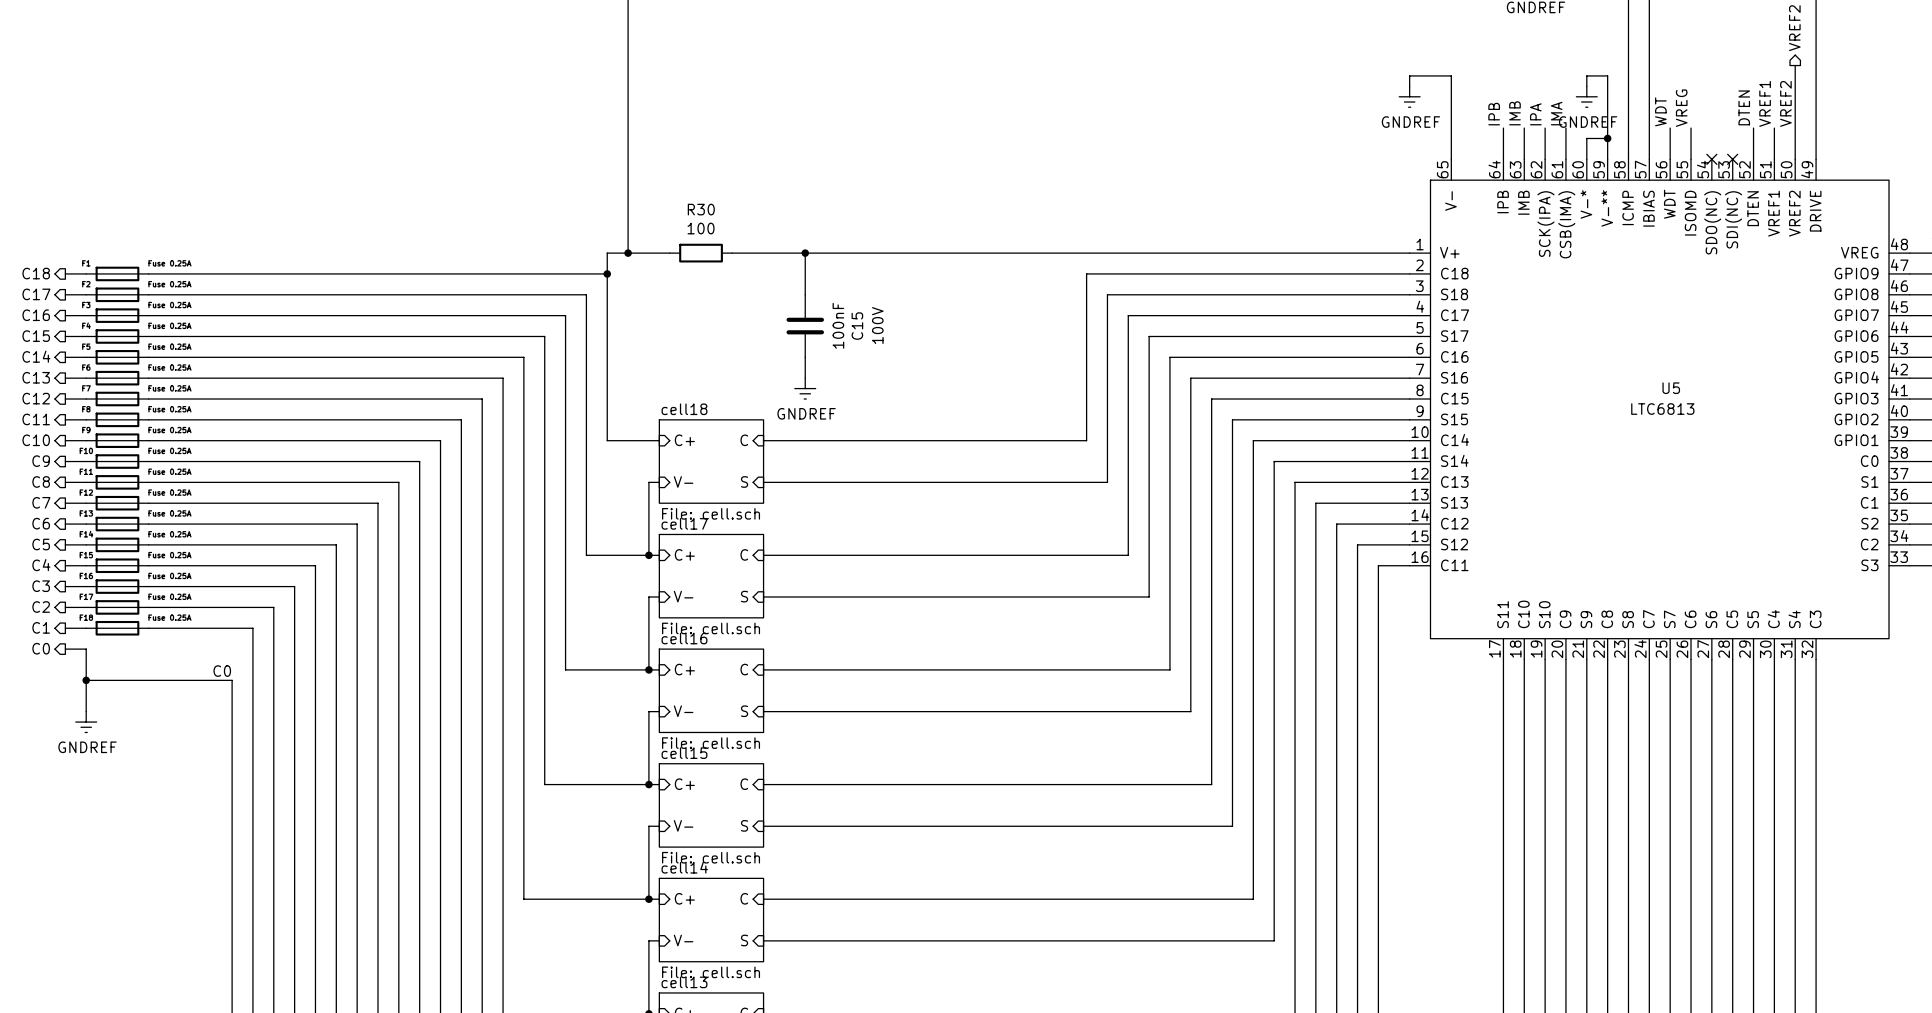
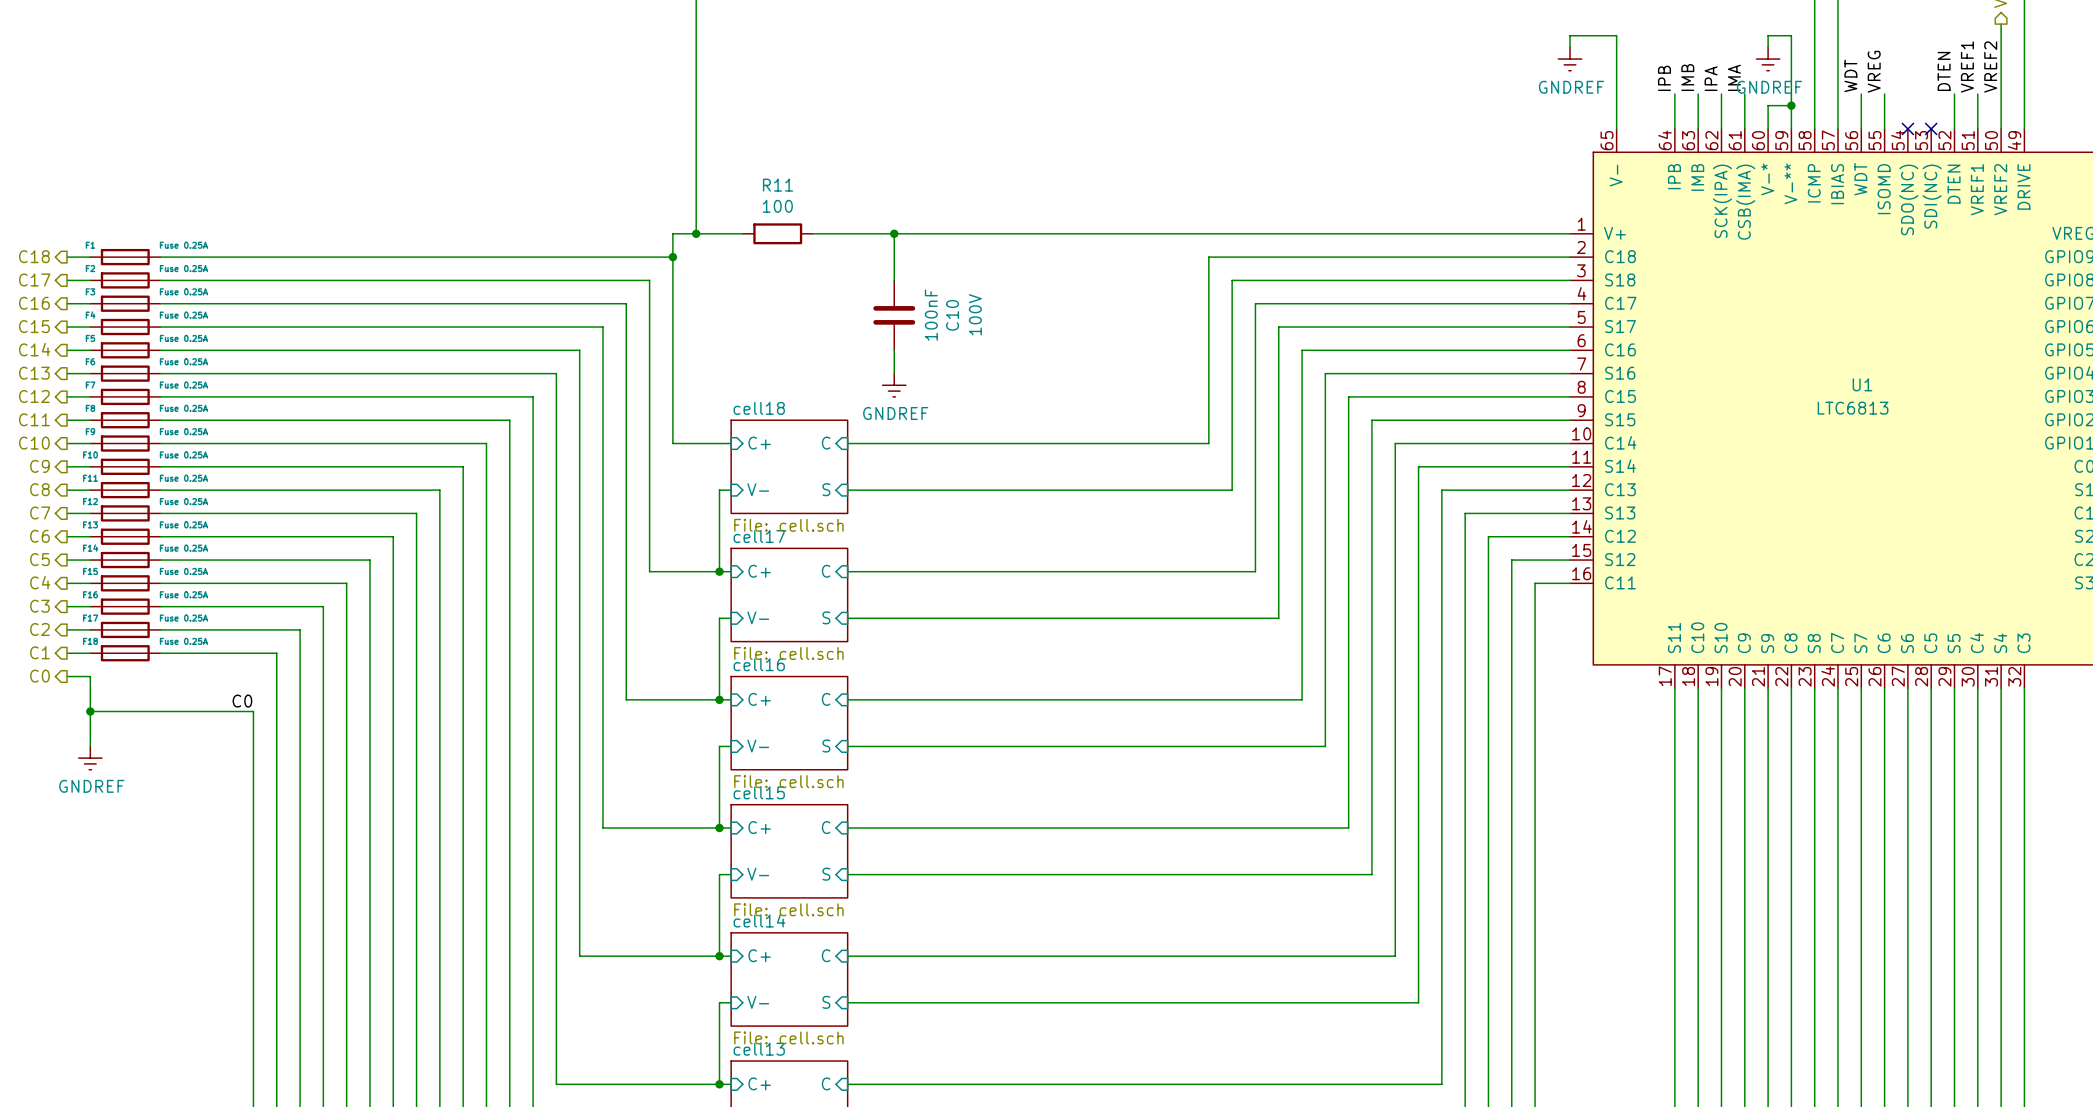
R30 name: R30 (701, 209) -> R11 (778, 185)
C15 name: C15 (857, 326) -> C10 (952, 315)
U5 name: U5 (1671, 388) -> U1 (1862, 384)

